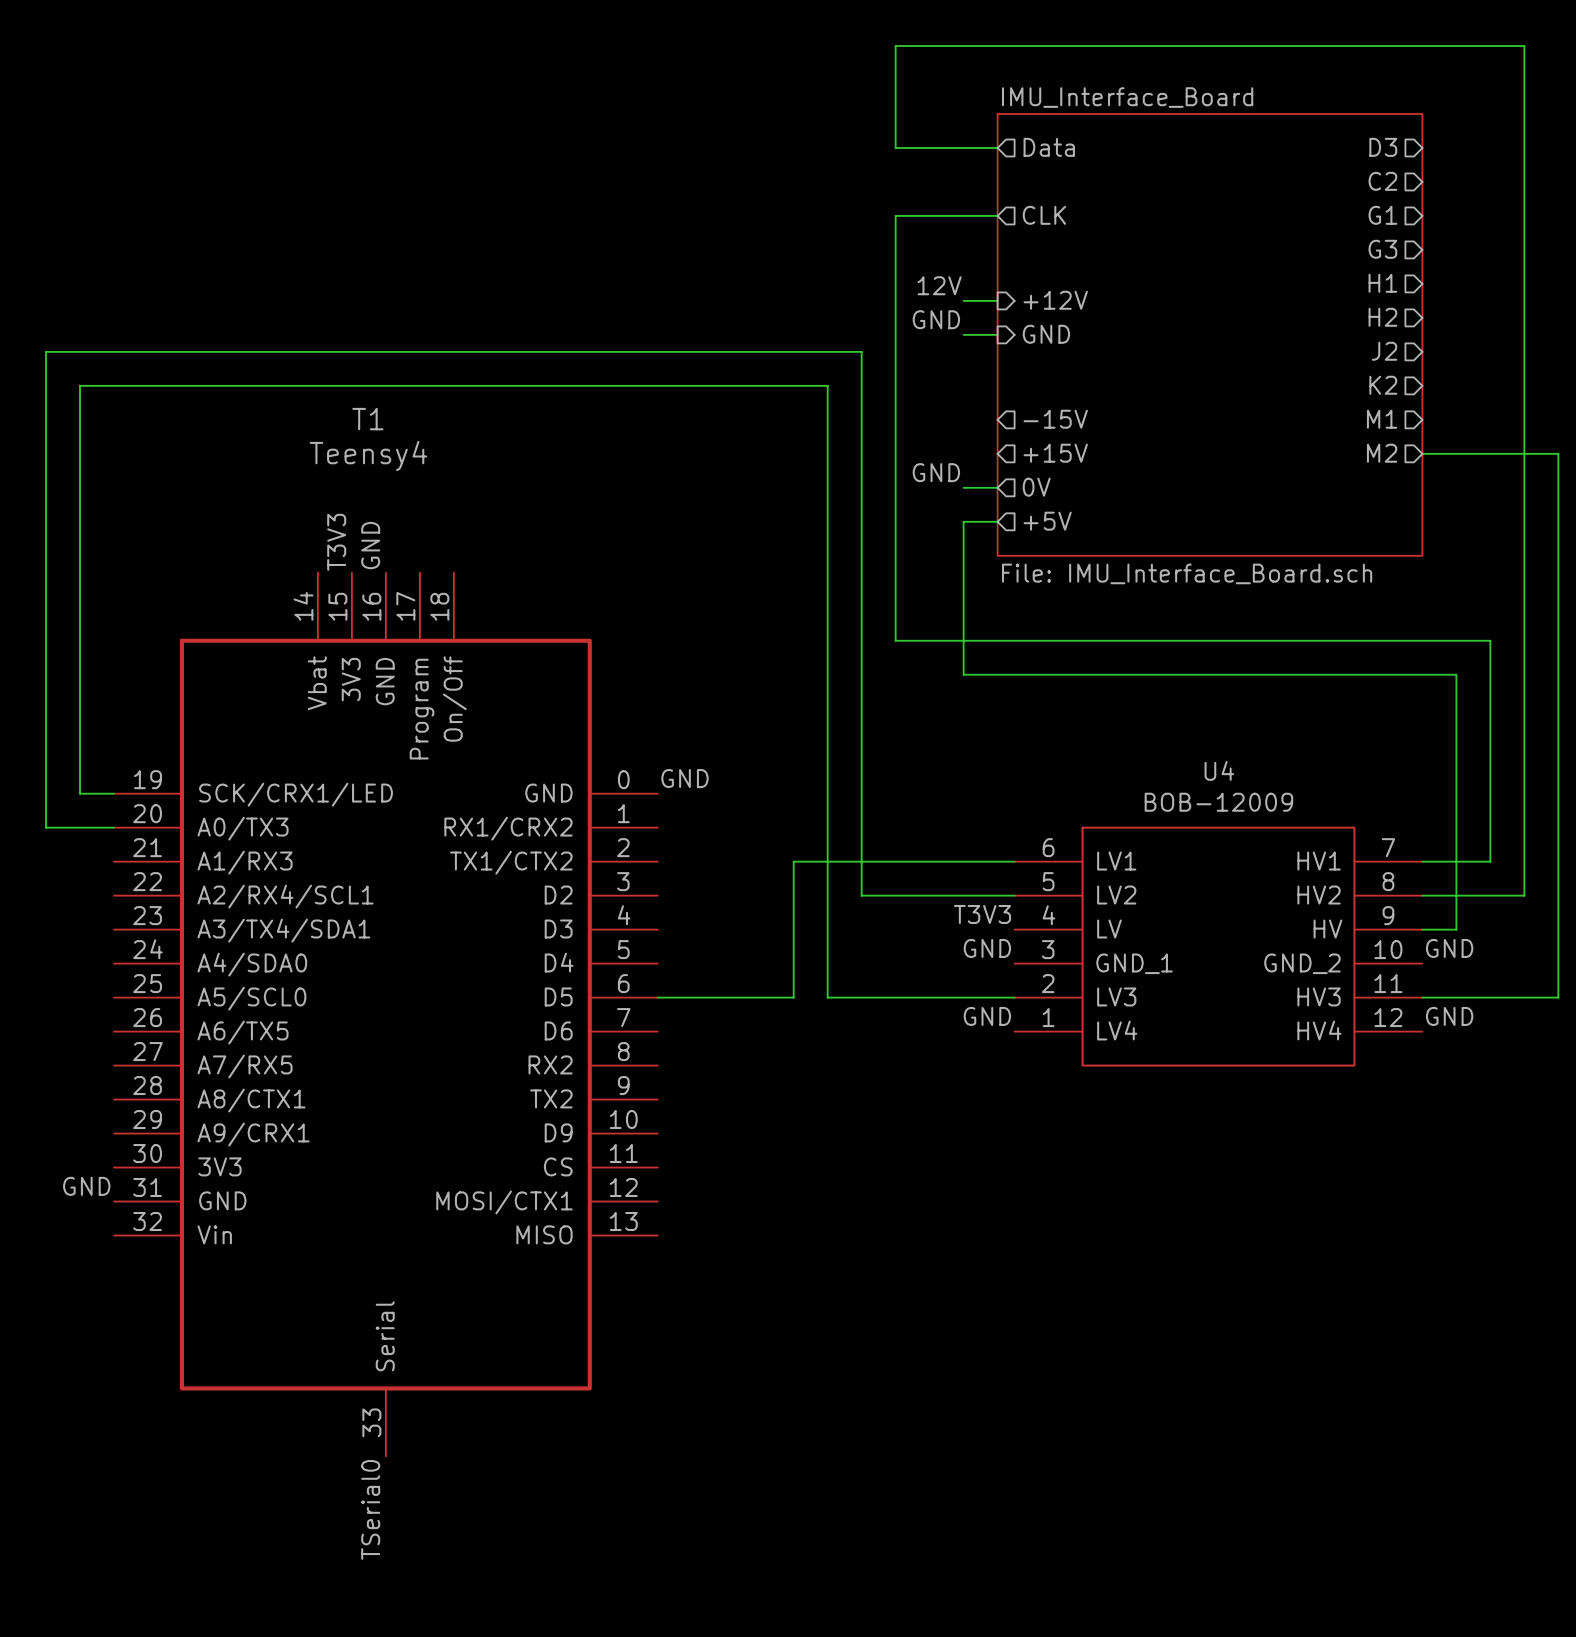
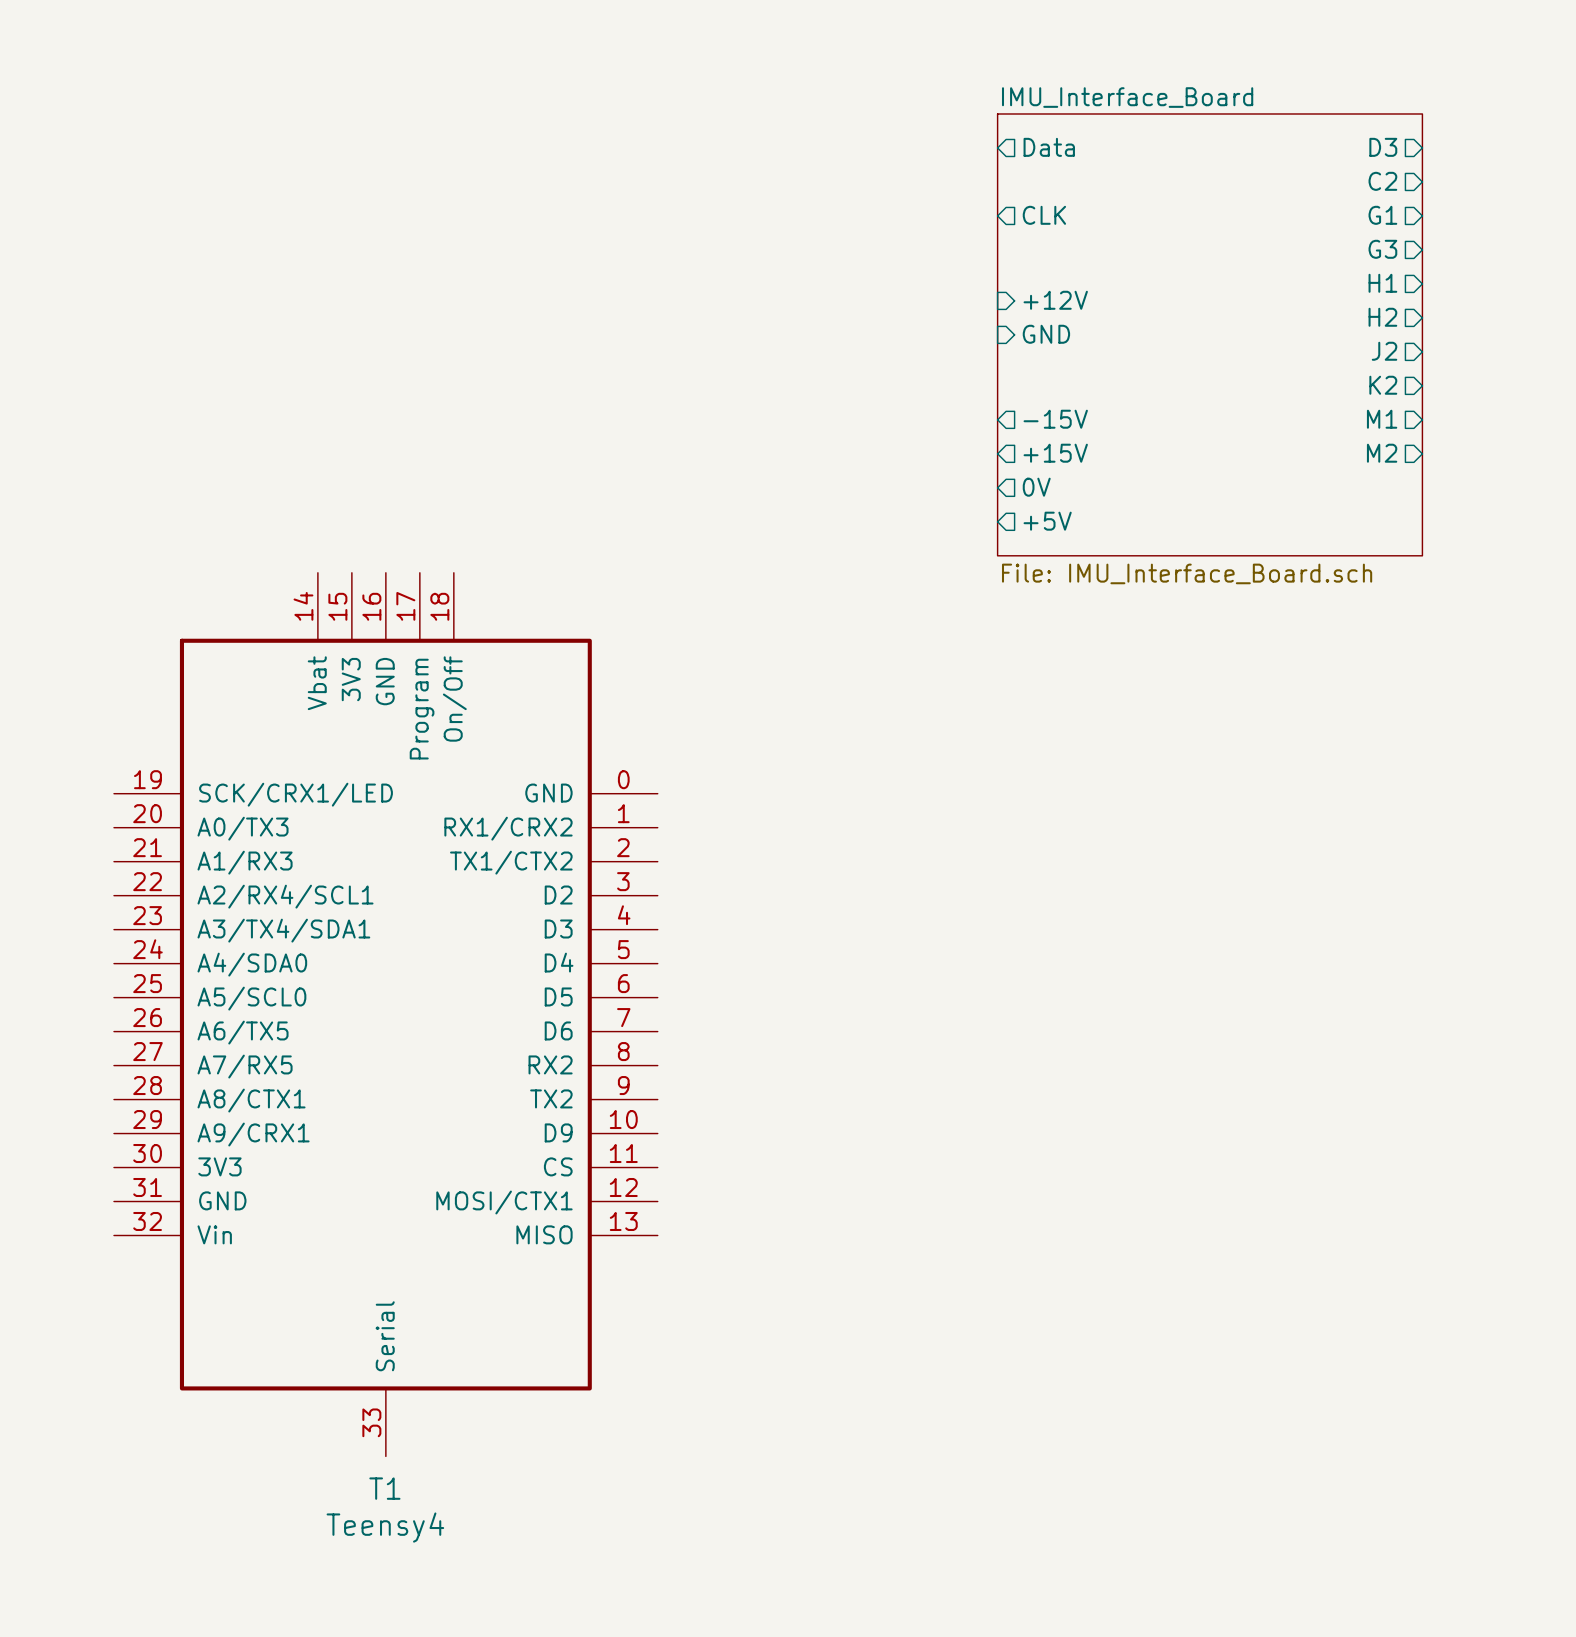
wire: (997, 147) (895, 147) (895, 46) (1524, 46) (1524, 895) (1422, 895) -> none
wire: (997, 215) (895, 215) (895, 640) (1490, 640) (1490, 861) (1422, 861) -> none
label: 12V (939, 285) -> none
wire: (963, 300) (997, 300) -> none
label: GND (936, 319) -> none
wire: (963, 334) (997, 334) -> none
T1 name position: T1 (367, 419) -> T1 (384, 1488)
wire: (1422, 453) (1558, 453) (1558, 997) (1422, 997) -> none
T1 value position: Teensy4 (368, 455) -> Teensy4 (385, 1527)
label: GND (936, 472) -> none
wire: (963, 487) (997, 487) -> none
wire: (997, 521) (963, 521) (963, 674) (1456, 674) (1456, 929) (1422, 929) -> none
label: T3V3 (336, 542) -> none
label: GND (370, 545) -> none
label: GND (684, 778) -> none
wire: (113, 793) (80, 793) (80, 385) (827, 385) (827, 997) (1014, 997) -> none
wire: (113, 827) (46, 827) (46, 351) (861, 351) (861, 895) (1014, 895) -> none
wire: (1014, 861) (793, 861) (793, 997) (657, 997) -> none
label: T3V3 (982, 914) -> none
U4: BOB-12009 (1218, 946) -> none
label: GND (987, 948) -> none
label: GND (1449, 948) -> none
label: GND (987, 1016) -> none
label: GND (1449, 1016) -> none
label: GND (86, 1186) -> none
label: TSerial0 (370, 1509) -> none

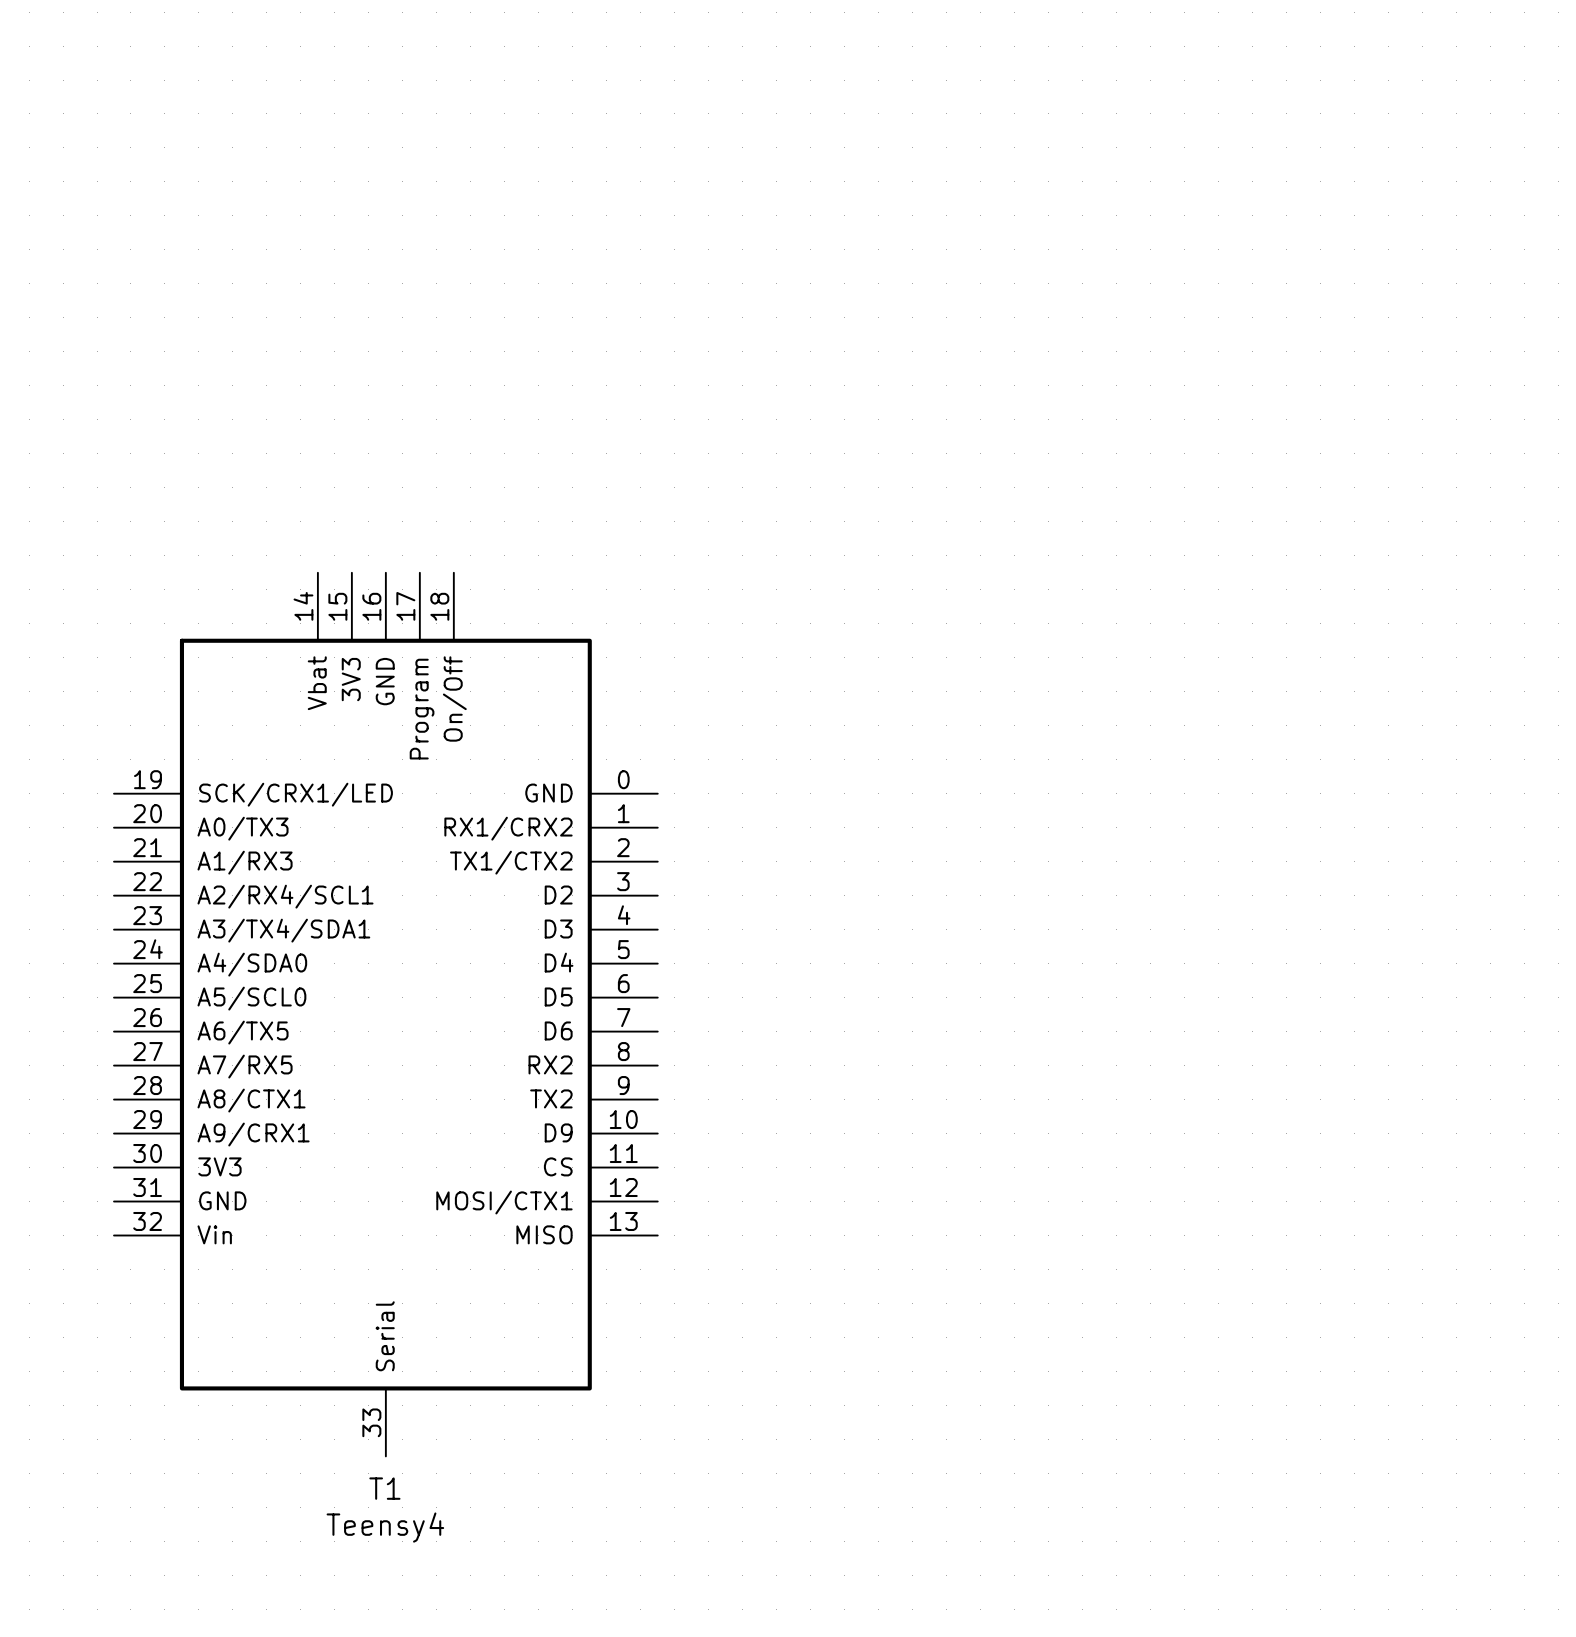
sheet pin: Data (1049, 147) -> none
sheet pin: D3 (1383, 147) -> none
sheet pin: C2 (1382, 181) -> none
sheet pin: CLK (1044, 215) -> none
sheet pin: G1 (1382, 215) -> none
sheet pin: G3 (1382, 249) -> none
sheet pin: H1 (1382, 283) -> none
sheet pin: +12V (1055, 300) -> none
sheet pin: H2 (1382, 317) -> none
sheet pin: GND (1046, 334) -> none
sheet IMU_Interface_Board: File: IMU_Interface_Board.sch (1210, 334) -> none
sheet pin: J2 (1384, 351) -> none
sheet pin: K2 (1383, 385) -> none
sheet pin: -15V (1055, 419) -> none
sheet pin: M1 (1382, 419) -> none
sheet pin: +15V (1055, 453) -> none
sheet pin: M2 (1382, 453) -> none
sheet pin: 0V (1036, 487) -> none
sheet pin: +5V (1047, 521) -> none

